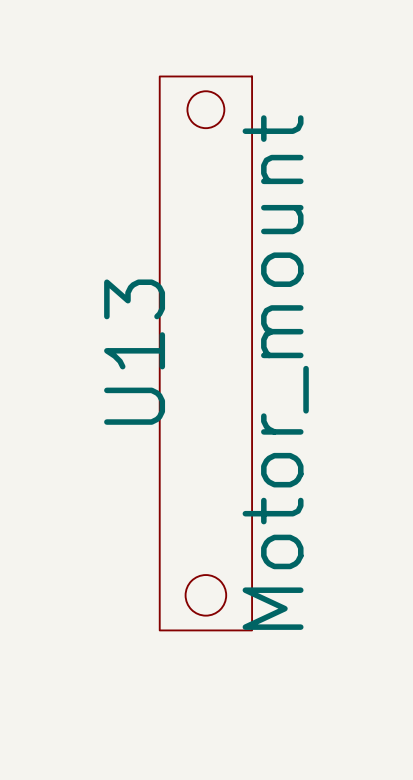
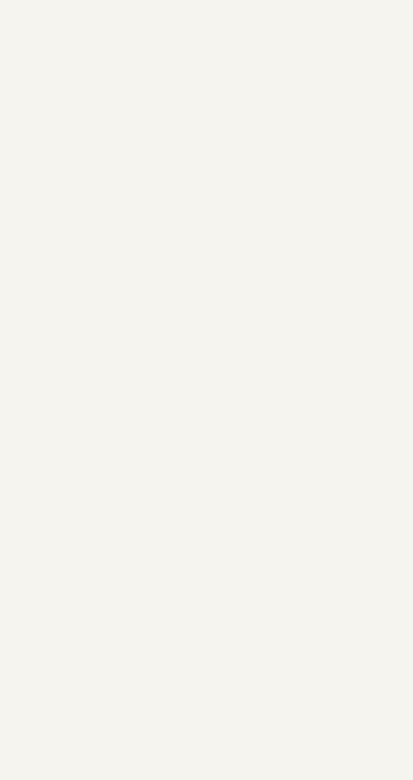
U13: Motor_mount (205, 353) -> none

